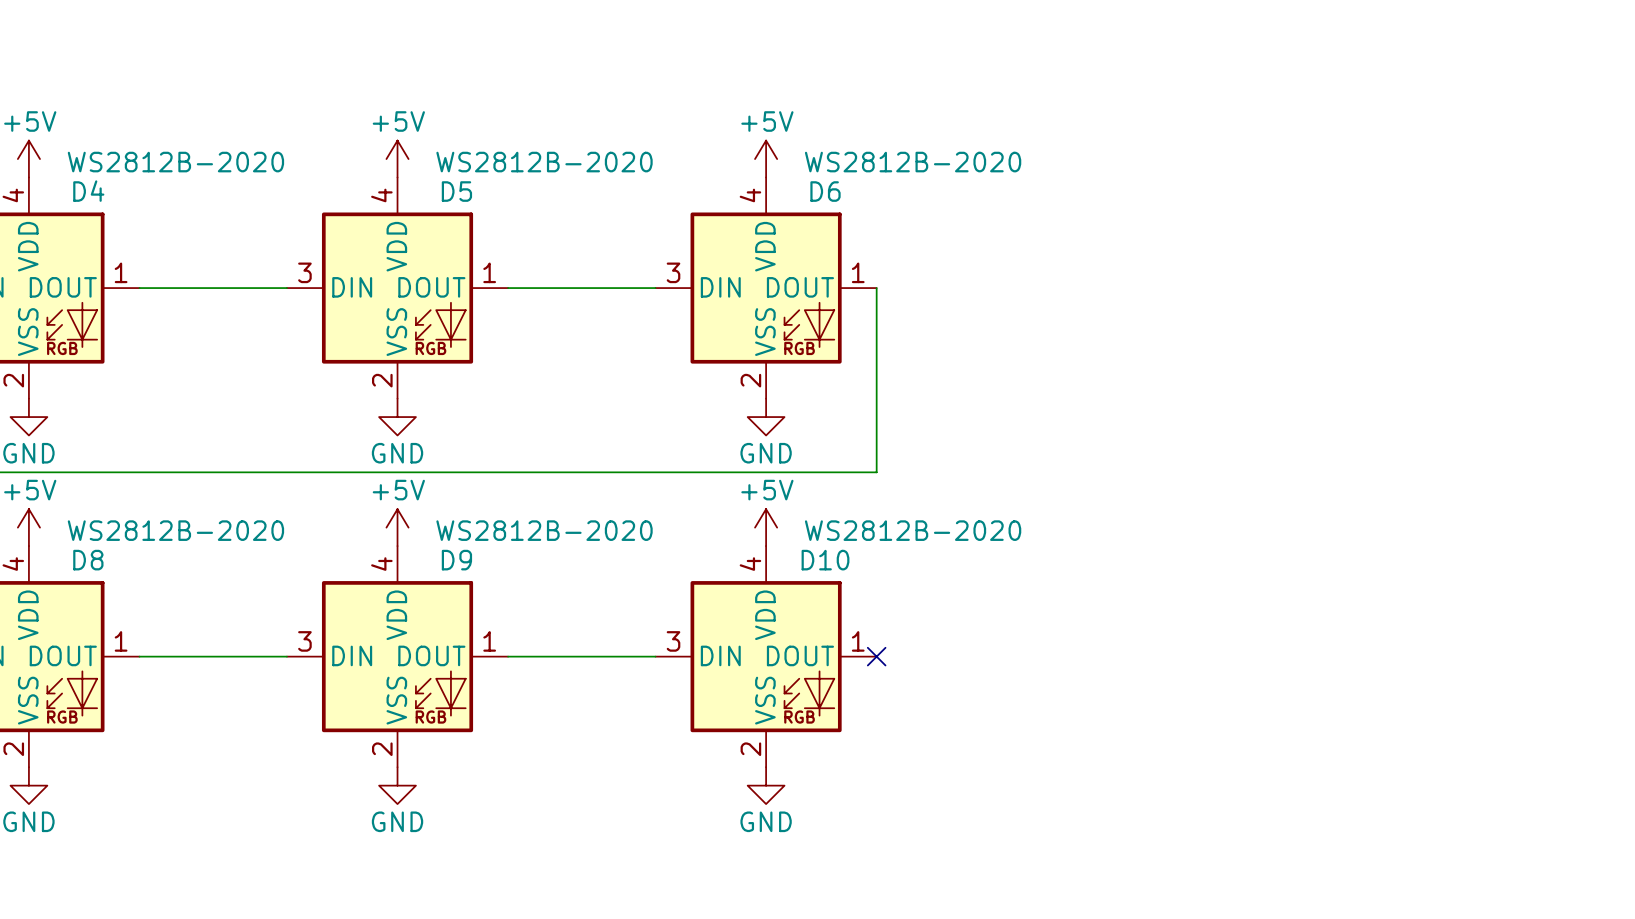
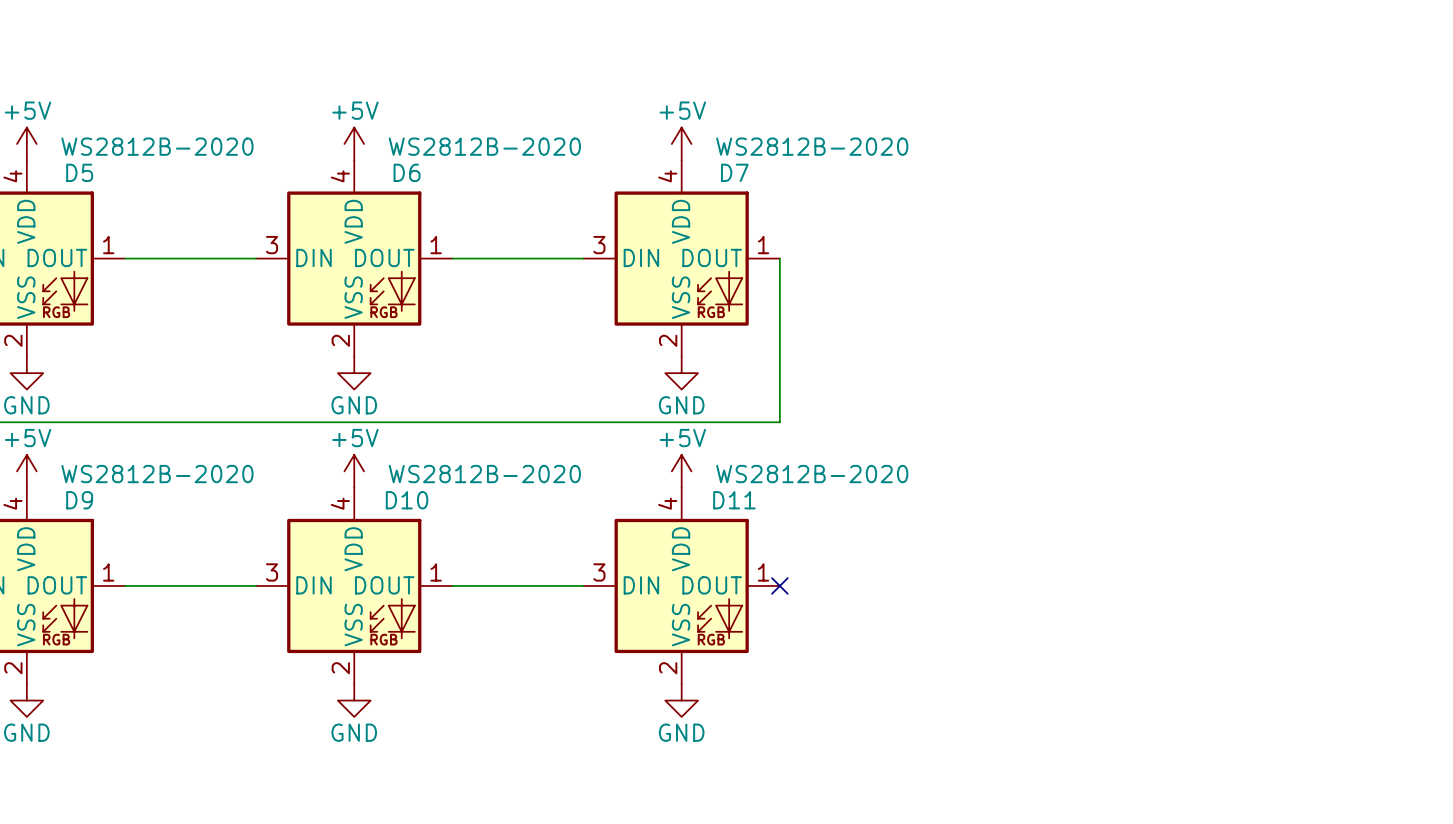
D4 name: D4 (88, 191) -> D5 (79, 172)
D5 name: D5 (456, 191) -> D6 (407, 172)
D6 name: D6 (825, 191) -> D7 (734, 172)
D8 name: D8 (88, 560) -> D9 (79, 500)
D9 name: D9 (456, 560) -> D10 (407, 500)
D10 name: D10 (825, 560) -> D11 (734, 500)

